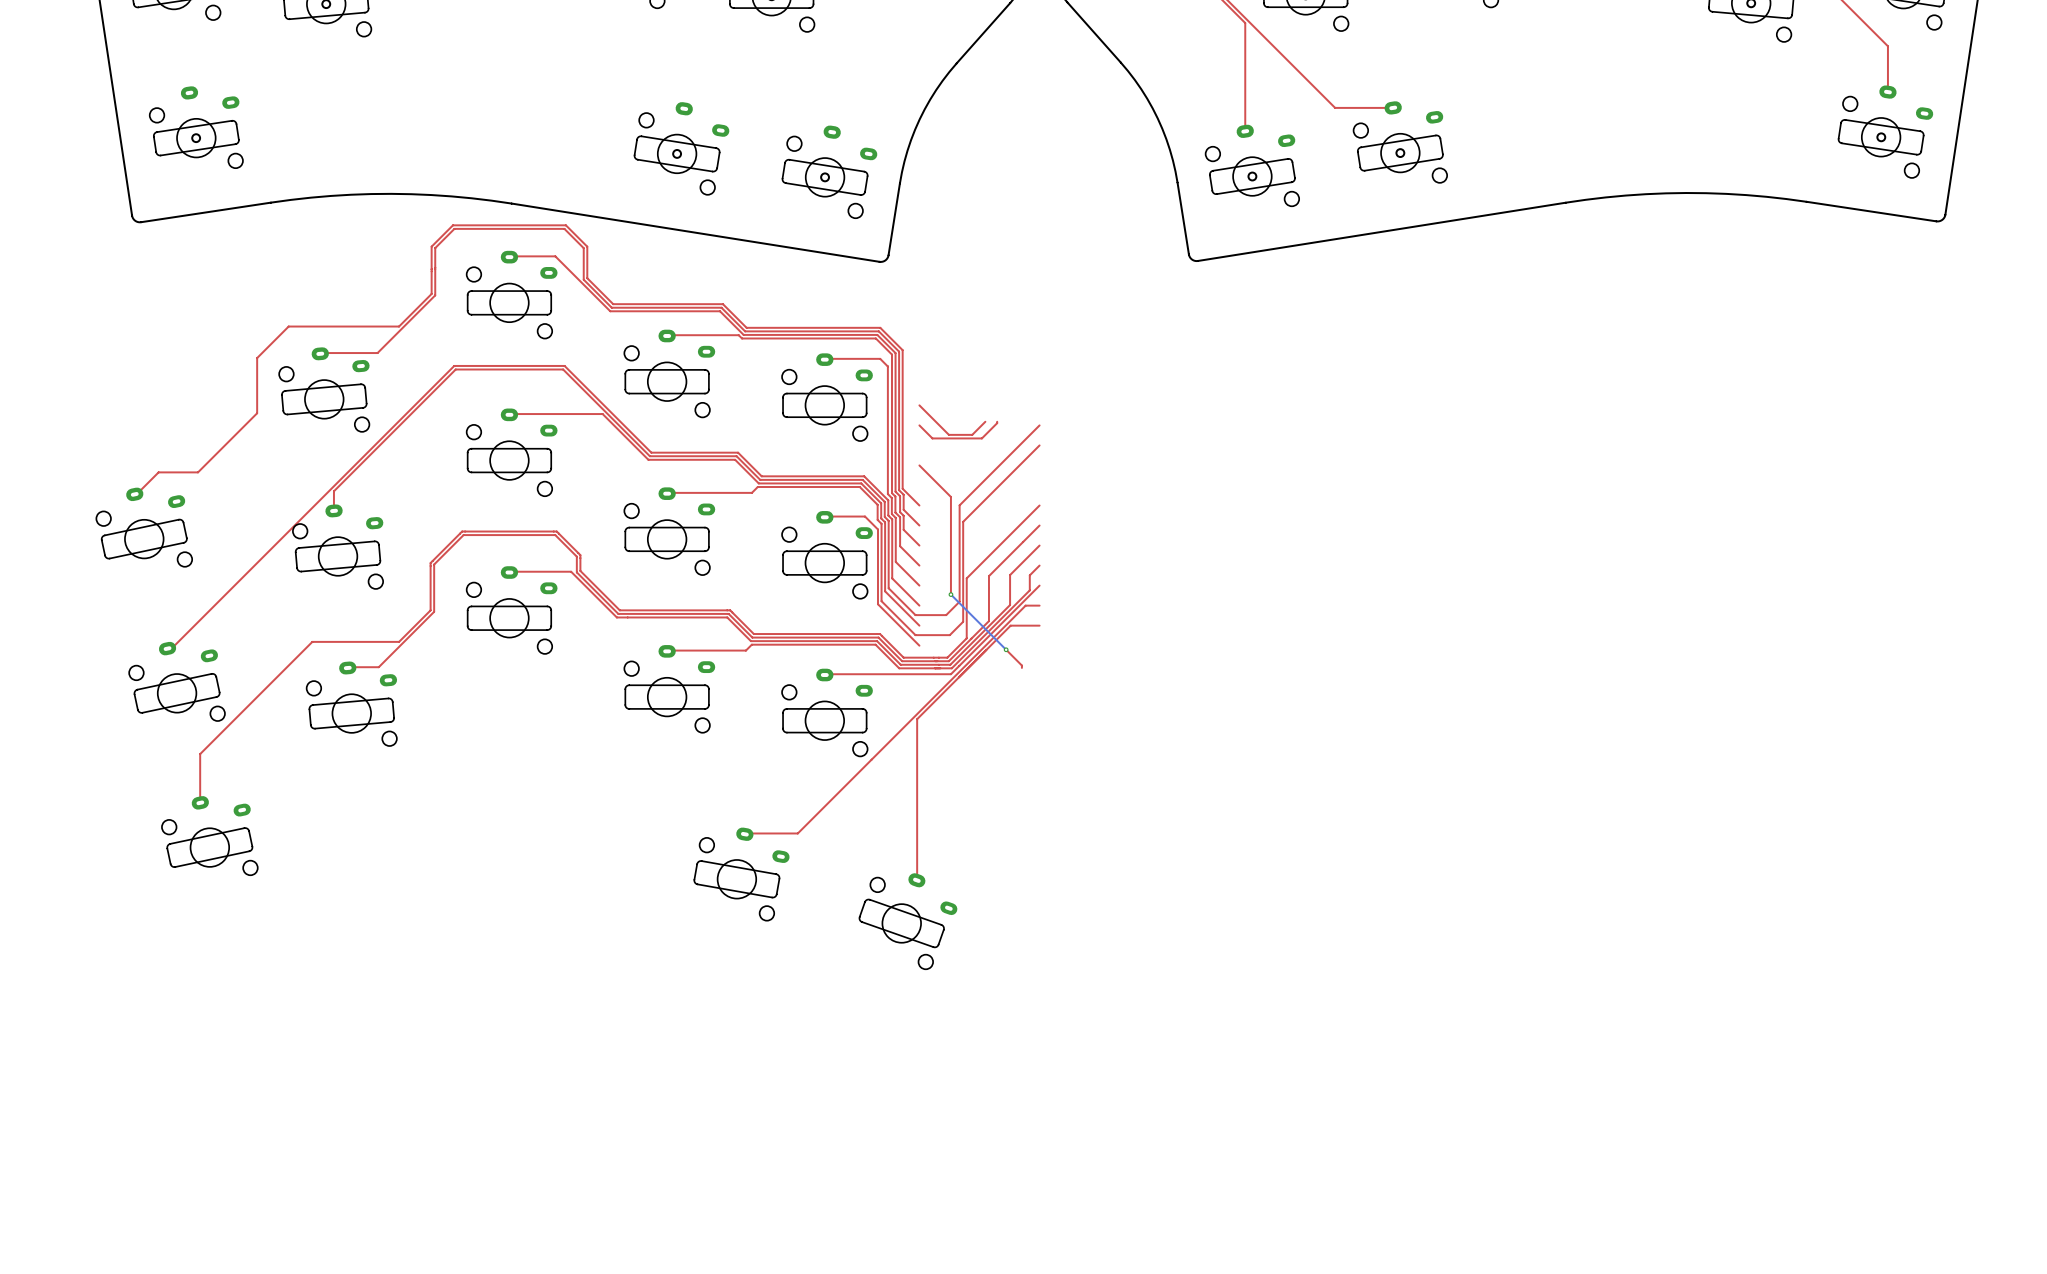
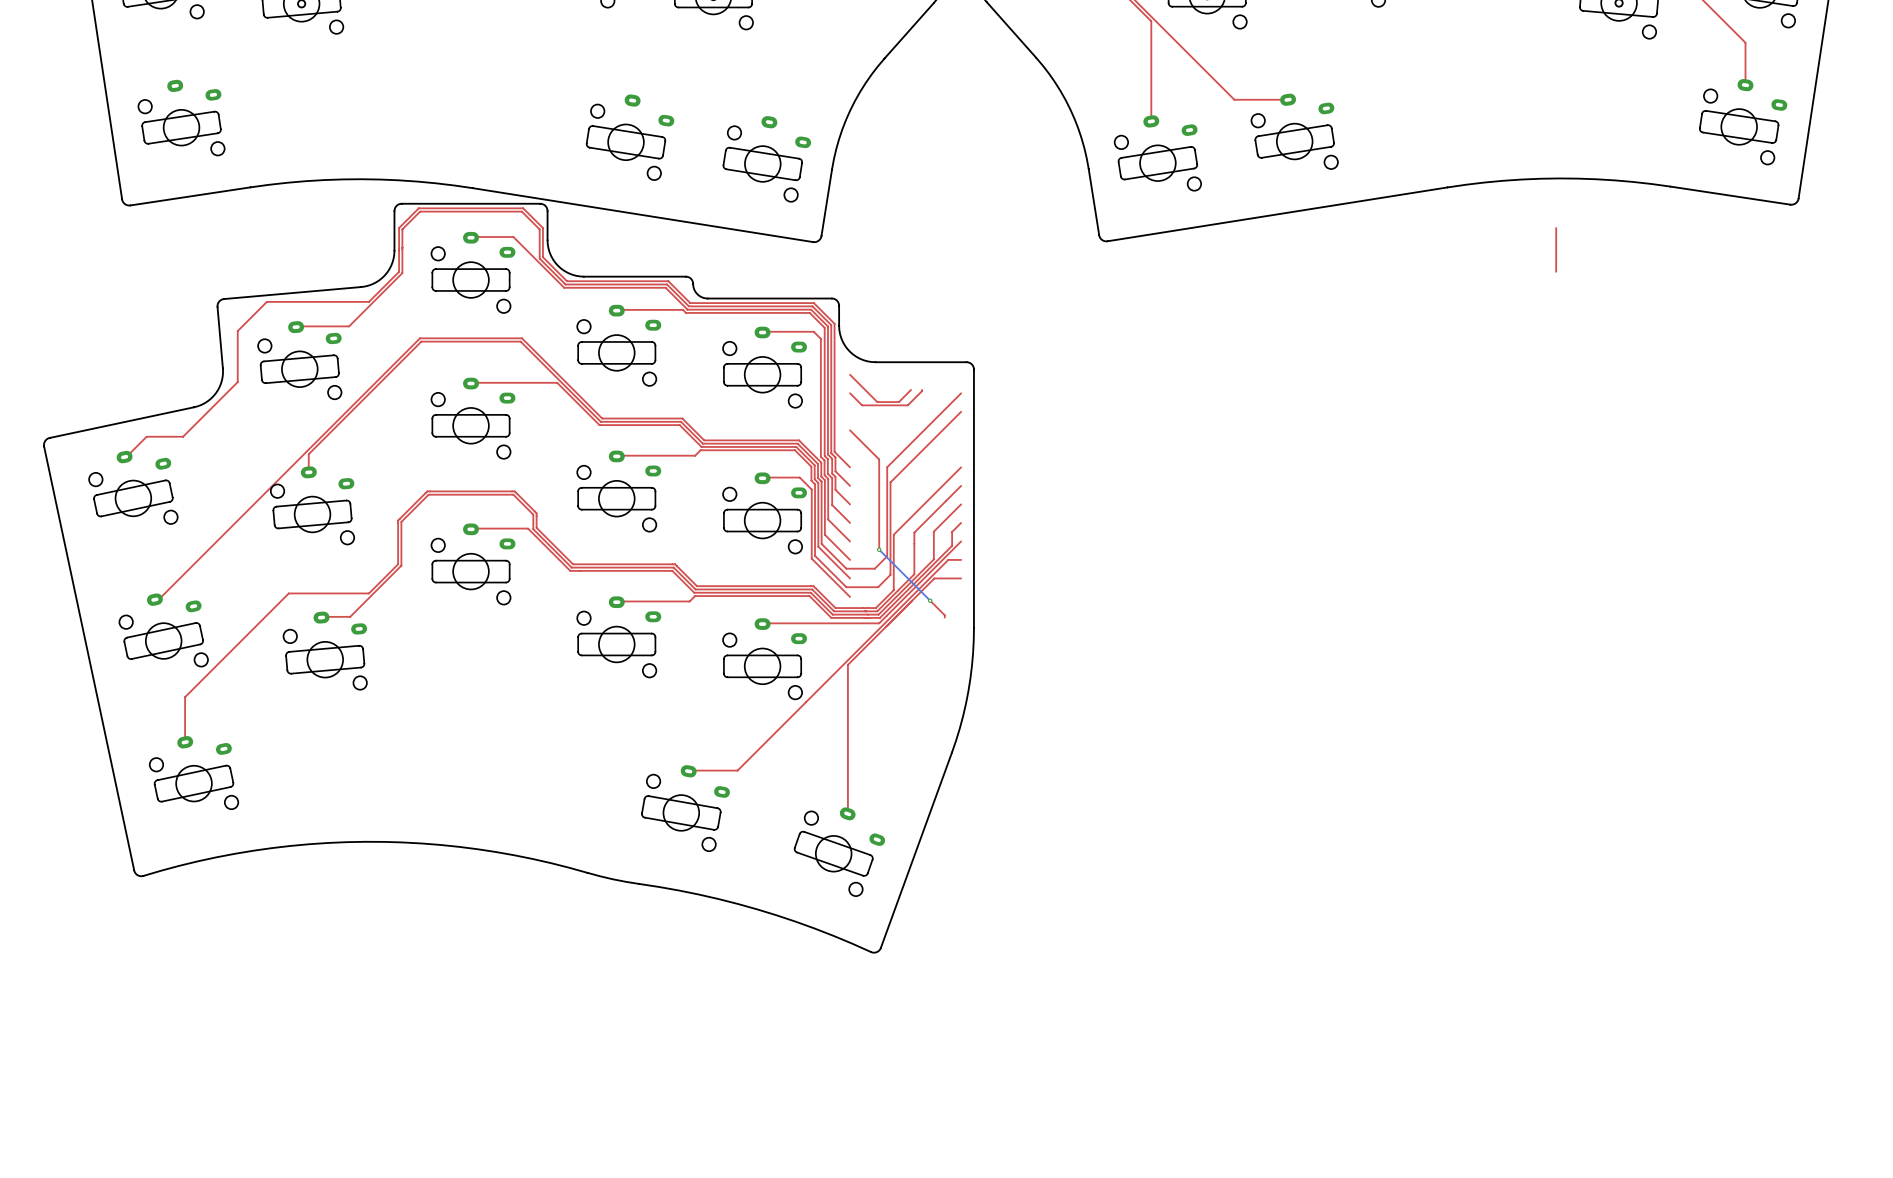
round board edge: [1876, 132, 1887, 143] -> none
round board edge: [191, 133, 202, 144] -> none
round board edge: [1395, 148, 1406, 159] -> none
round board edge: [672, 149, 683, 159] -> none
round board edge: [1247, 171, 1258, 182] -> none
round board edge: [820, 172, 830, 183] -> none
board edge: none -> (540, 203) (398, 204) (394, 210) (392, 262) (387, 272) (375, 282) (361, 287) (224, 299) (219, 301) (217, 306) (222, 375) (217, 390) (207, 401) (194, 407) (49, 437) (45, 441) (44, 446) (134, 872) (142, 876) (216, 857) (308, 844) (383, 841) (458, 846) (514, 855) (613, 879) (718, 899) (796, 921) (871, 952) (876, 952) (880, 947) (951, 752) (968, 691) (973, 627) (973, 366) (967, 362) (875, 362) (859, 358) (849, 351) (842, 341) (839, 329) (838, 304) (833, 298) (705, 298) (696, 292) (692, 280) (687, 276) (583, 276) (571, 274) (561, 268) (551, 256) (547, 244) (547, 209) (544, 205) (540, 203)
top track: none -> (1556, 228) (1556, 271)

